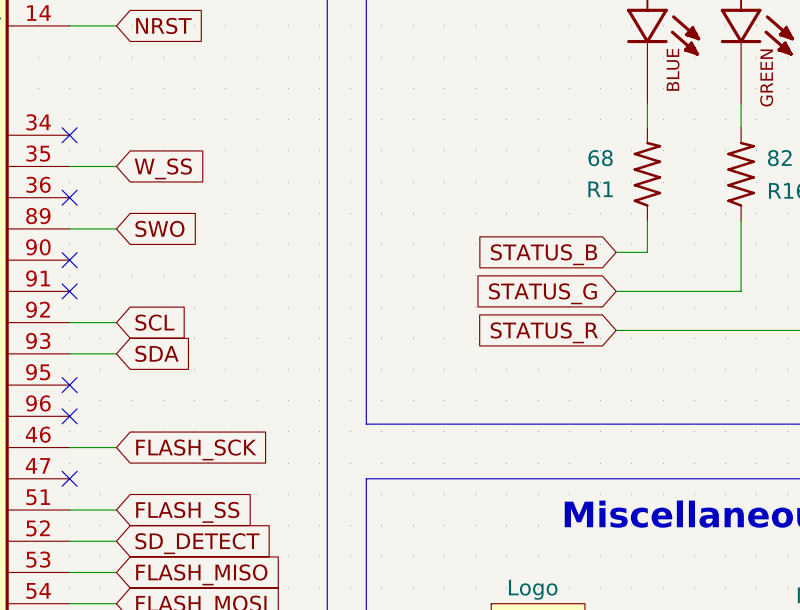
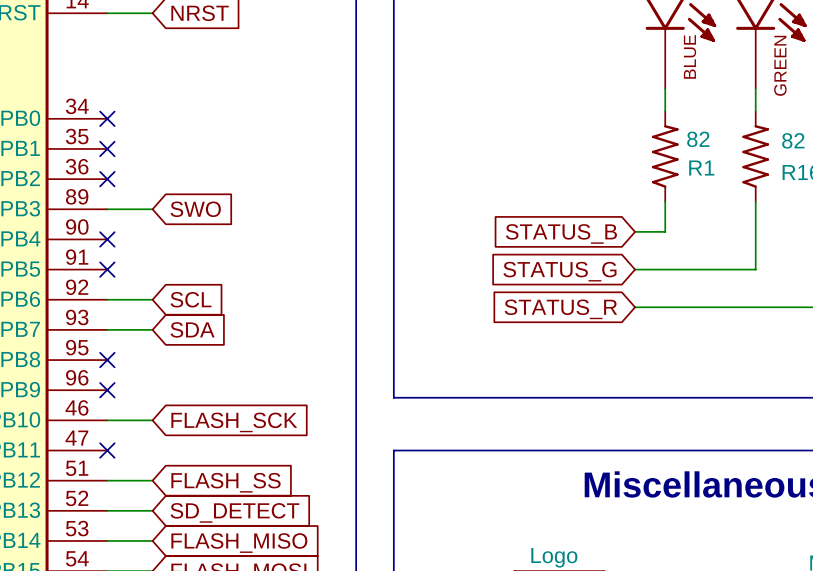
R1 value: 68 (600, 158) -> 82 (698, 139)
wire: (69, 166) (116, 166) -> none
no-connect mark: none -> (107, 148)
global label: W_SS (163, 168) -> none
R1 name position: R1 (600, 189) -> R1 (701, 168)

